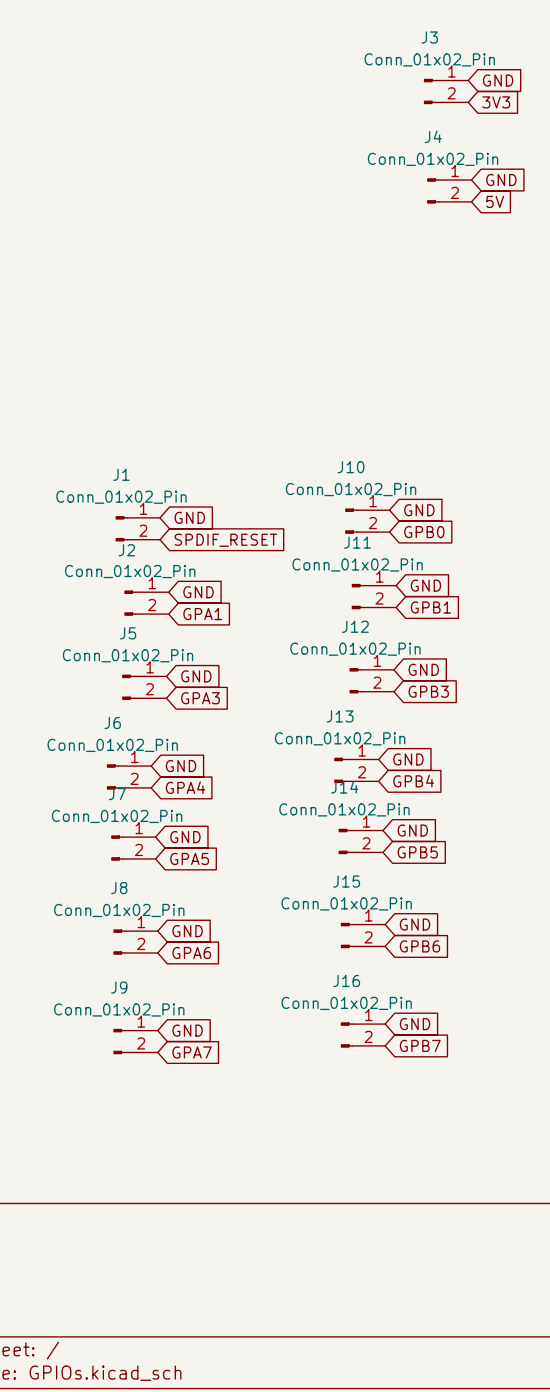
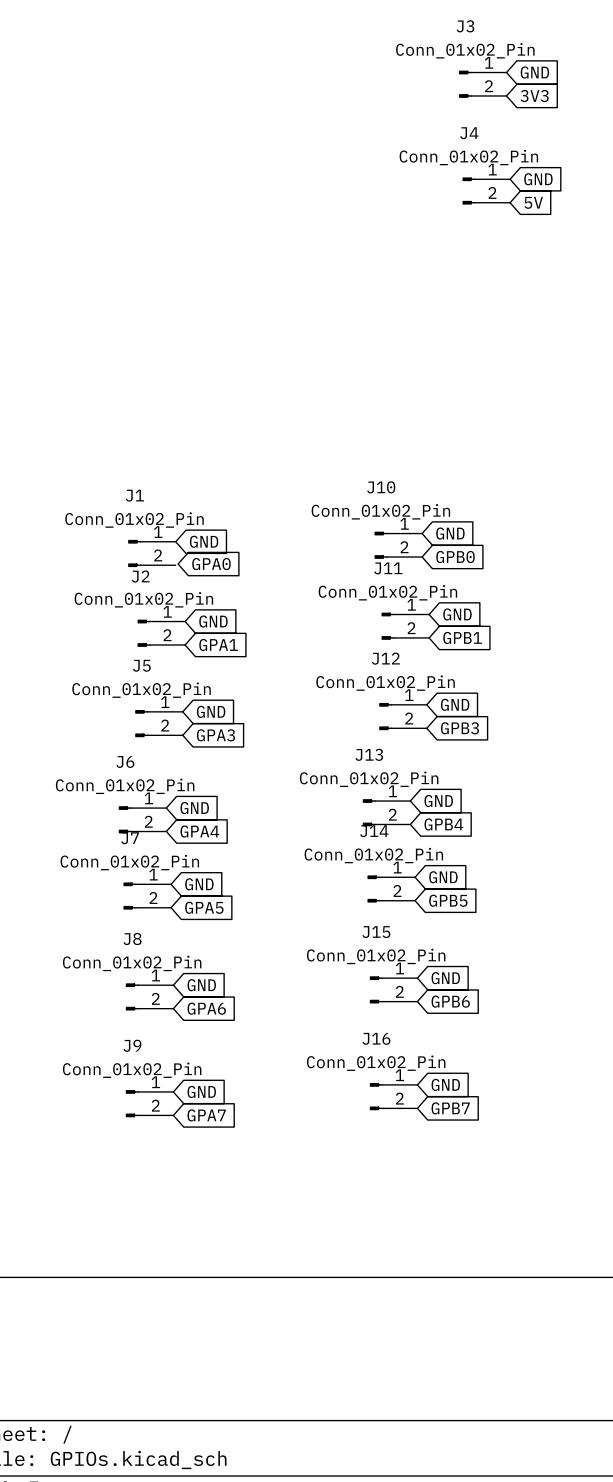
global label: SPDIF_RESET (225, 540) -> GPA0 (211, 564)

